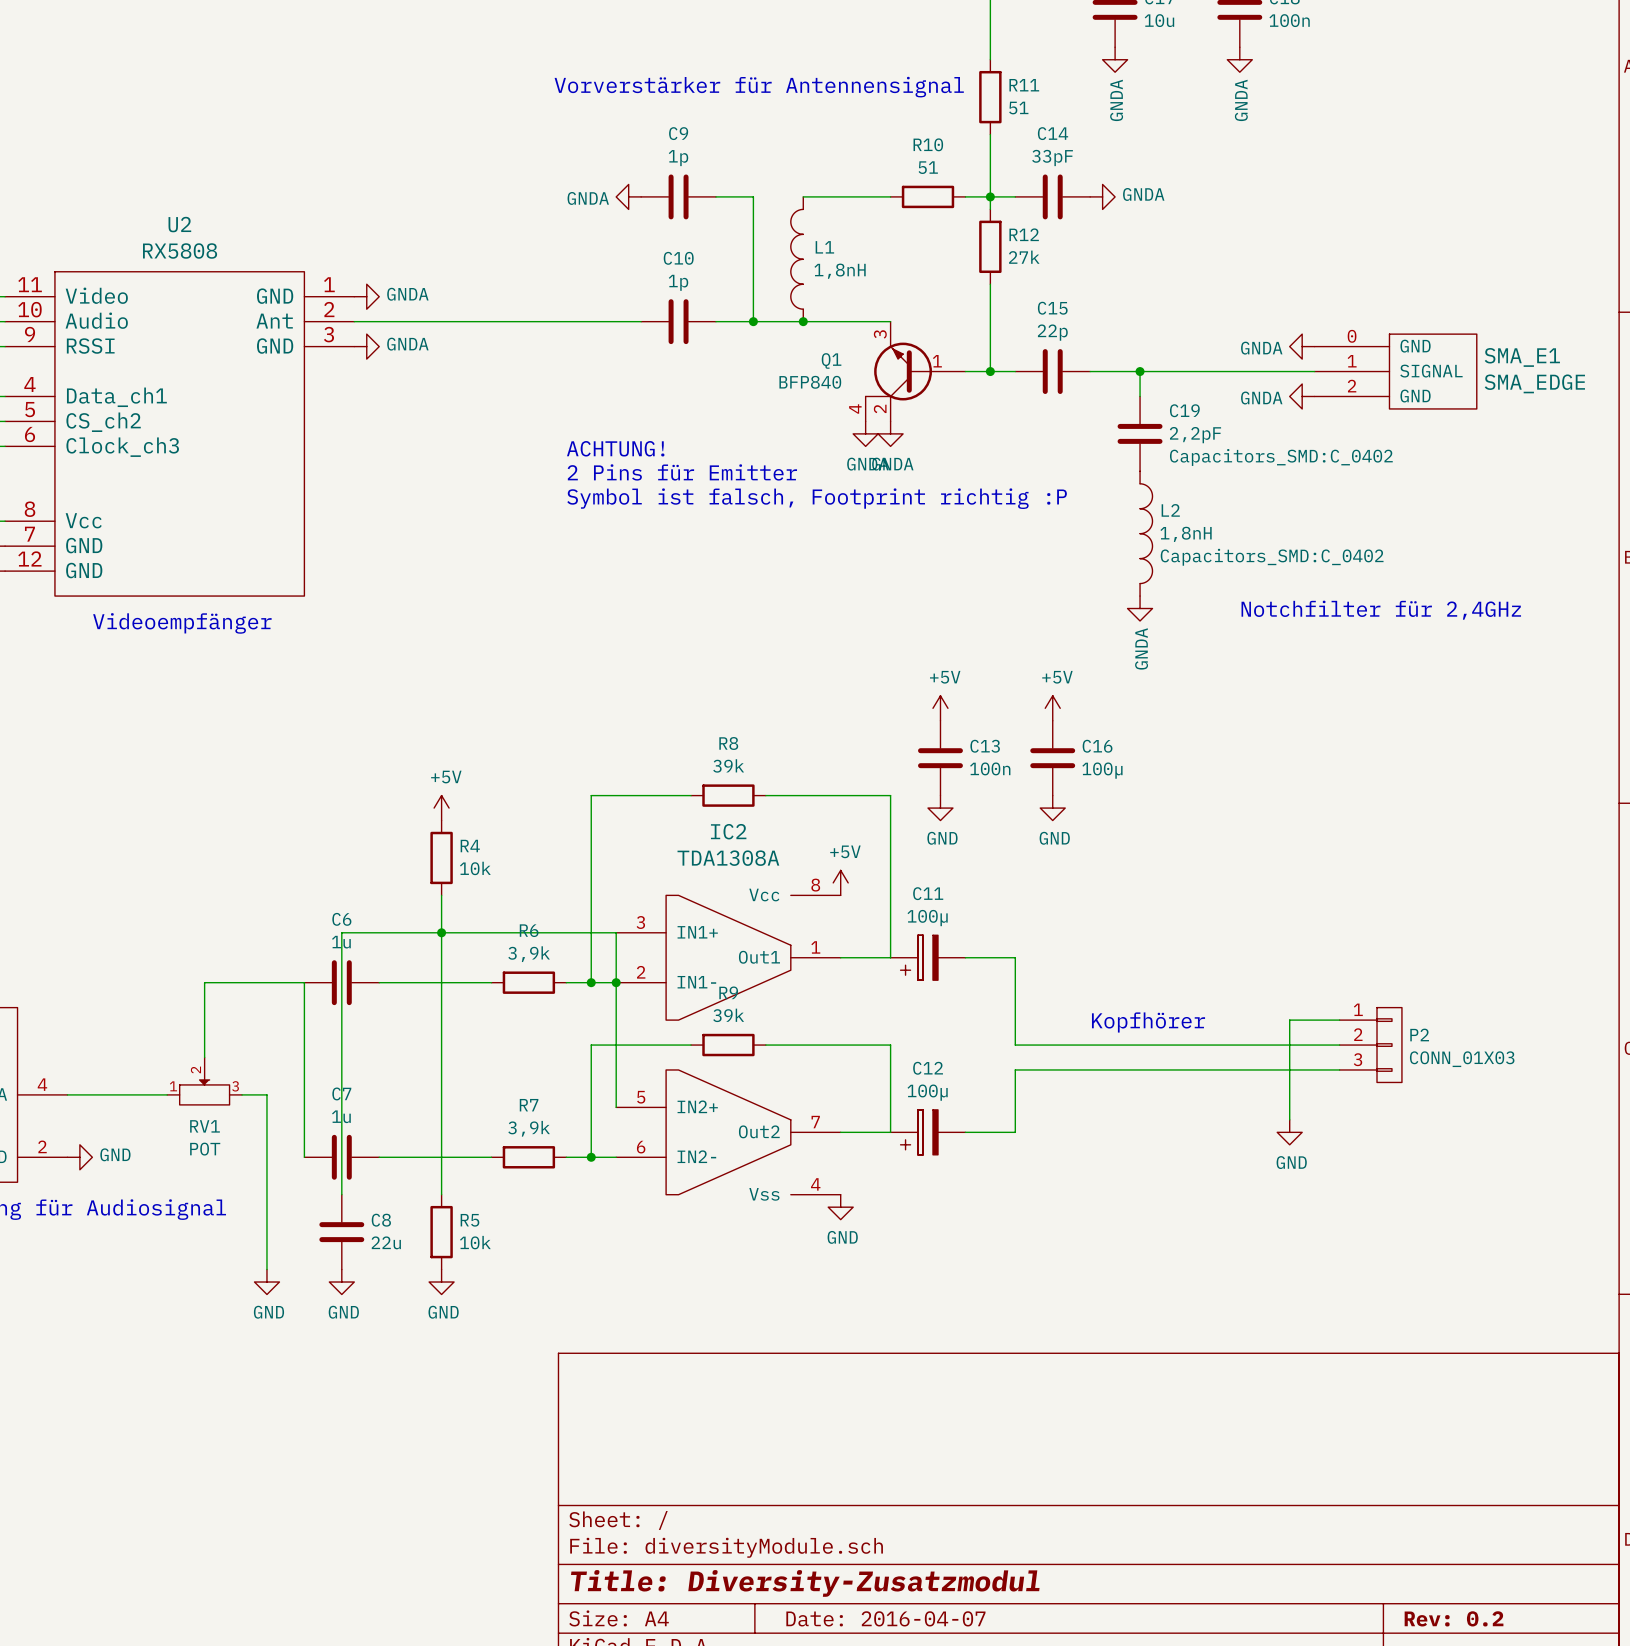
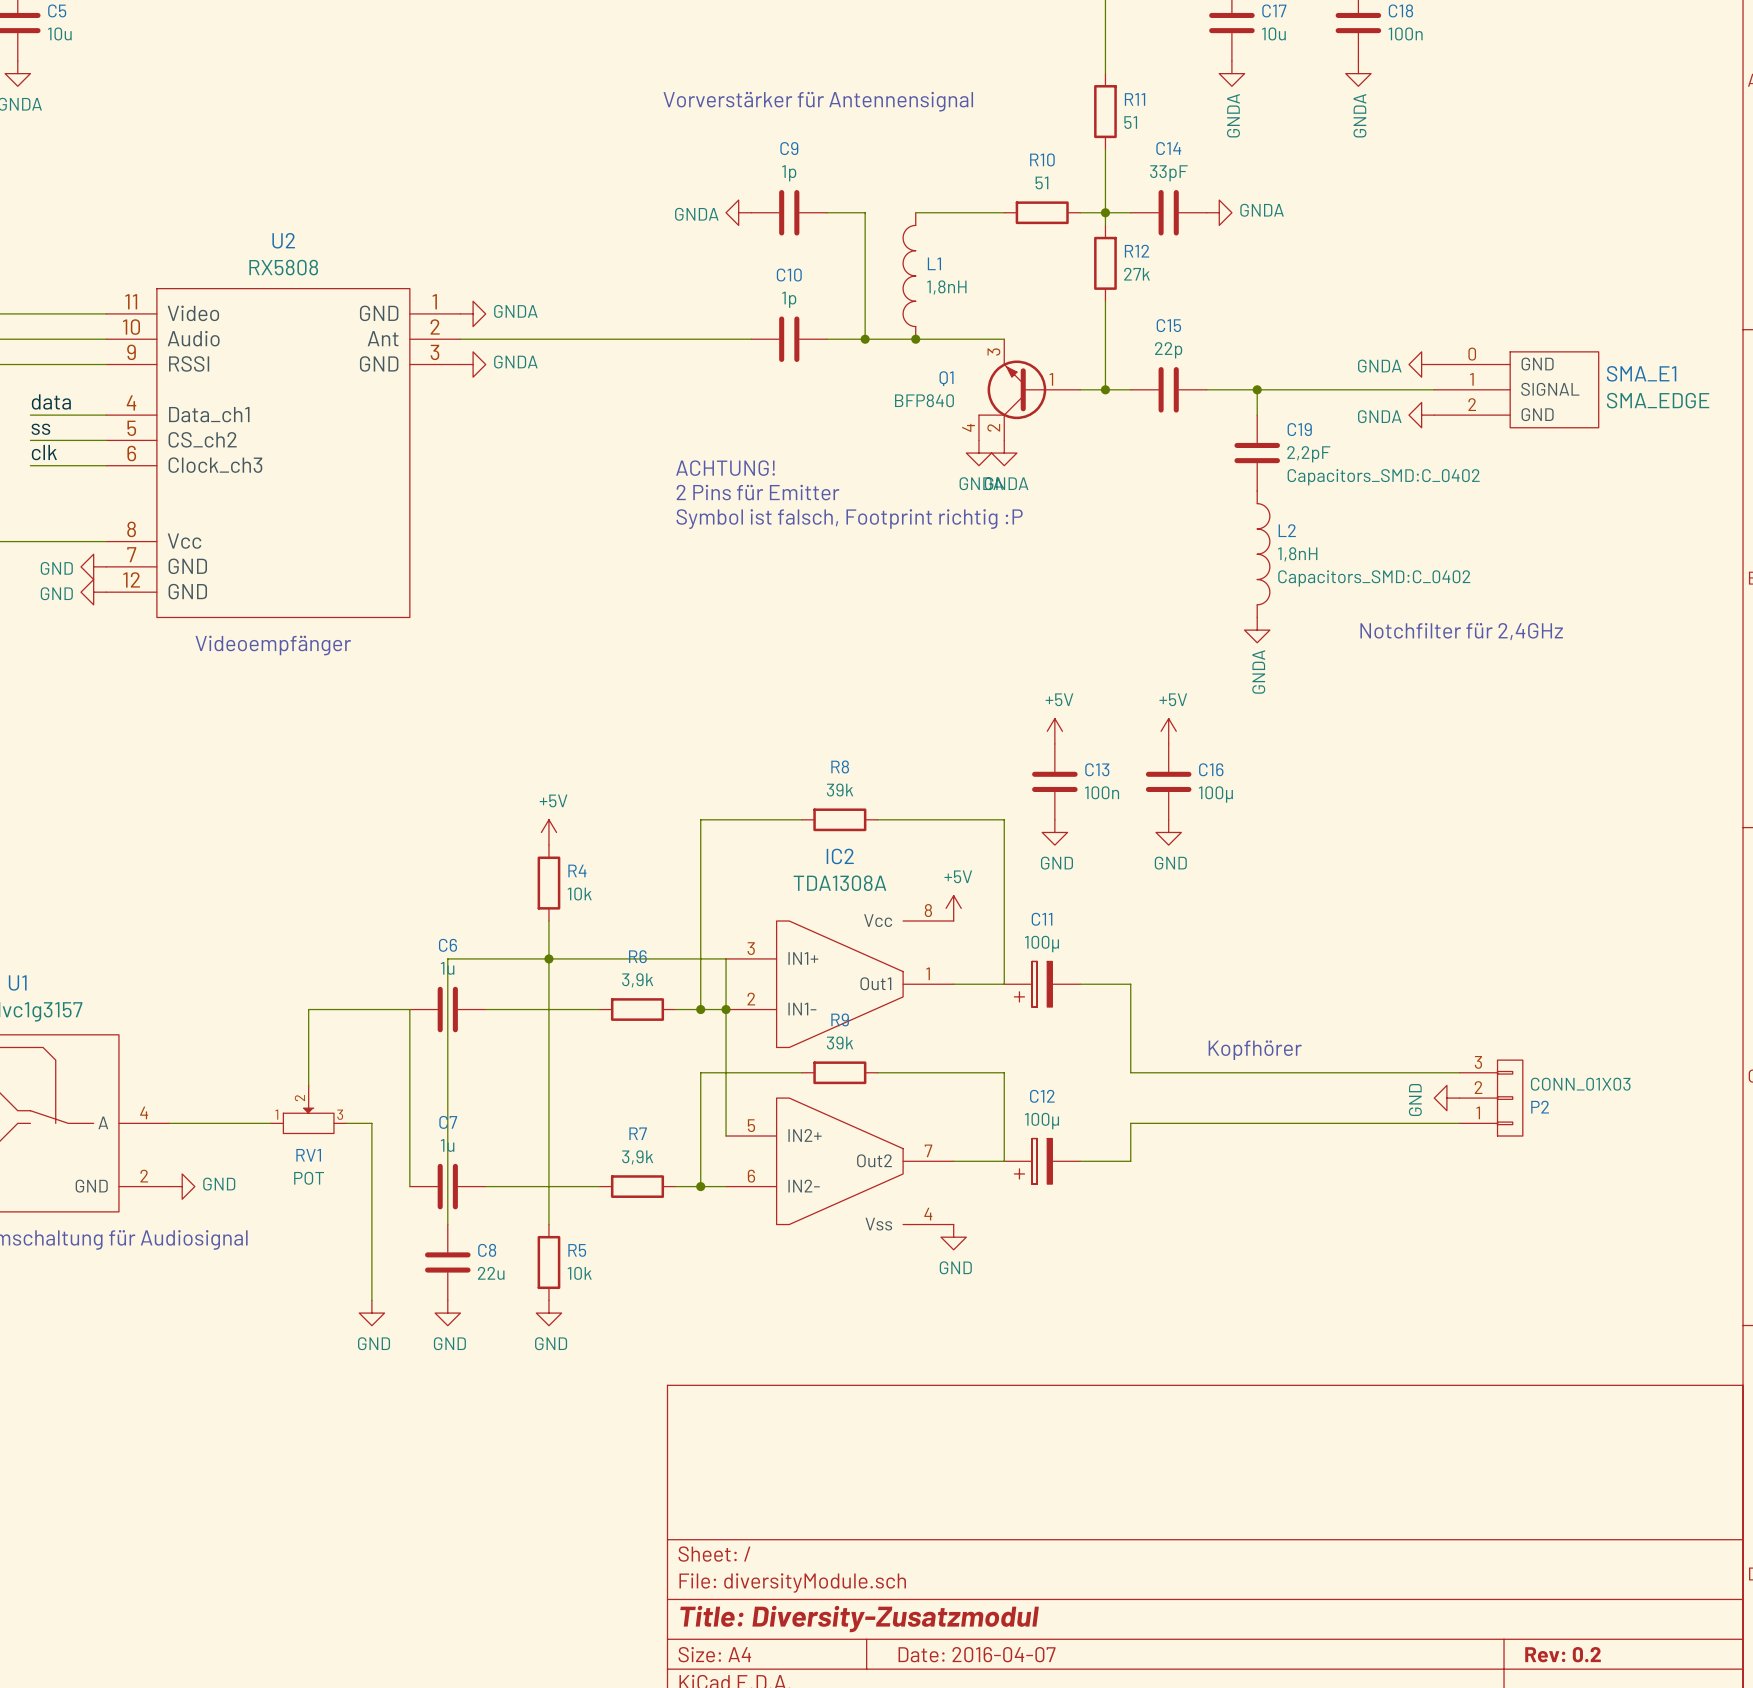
wire: (1339, 1020) (1289, 1020) (1289, 1119) -> none
P2 flip: as is (1389, 1045) -> up-down (1510, 1098)
wire: (1339, 1069) (1015, 1069) (1015, 1094) -> (1459, 1123) (1130, 1123)
power symbol rotation: 0° (1289, 1132) -> 90° clockwise (1446, 1098)
power symbol position: GND (1289, 1132) -> GND (1446, 1098)

